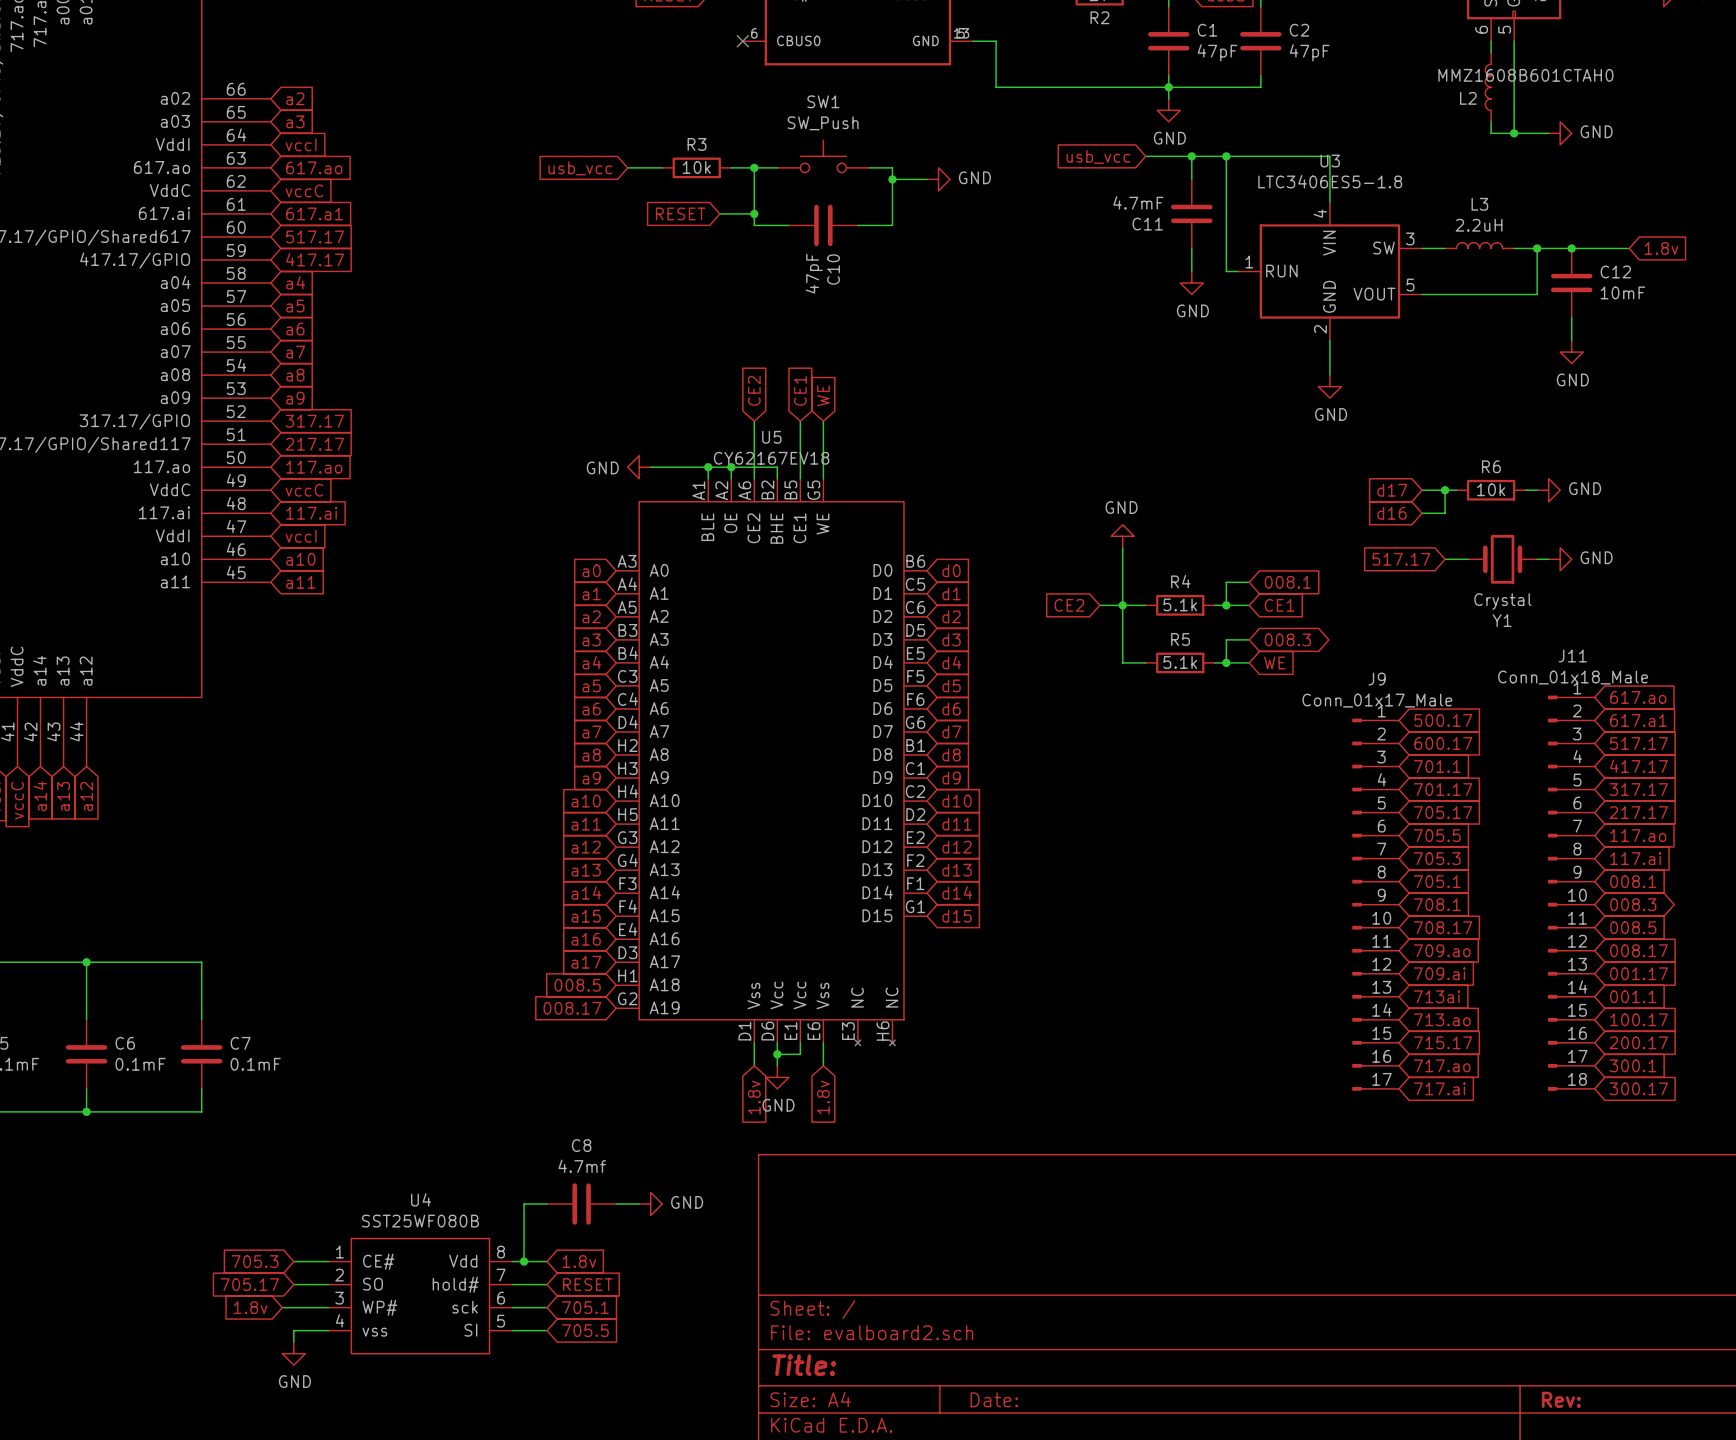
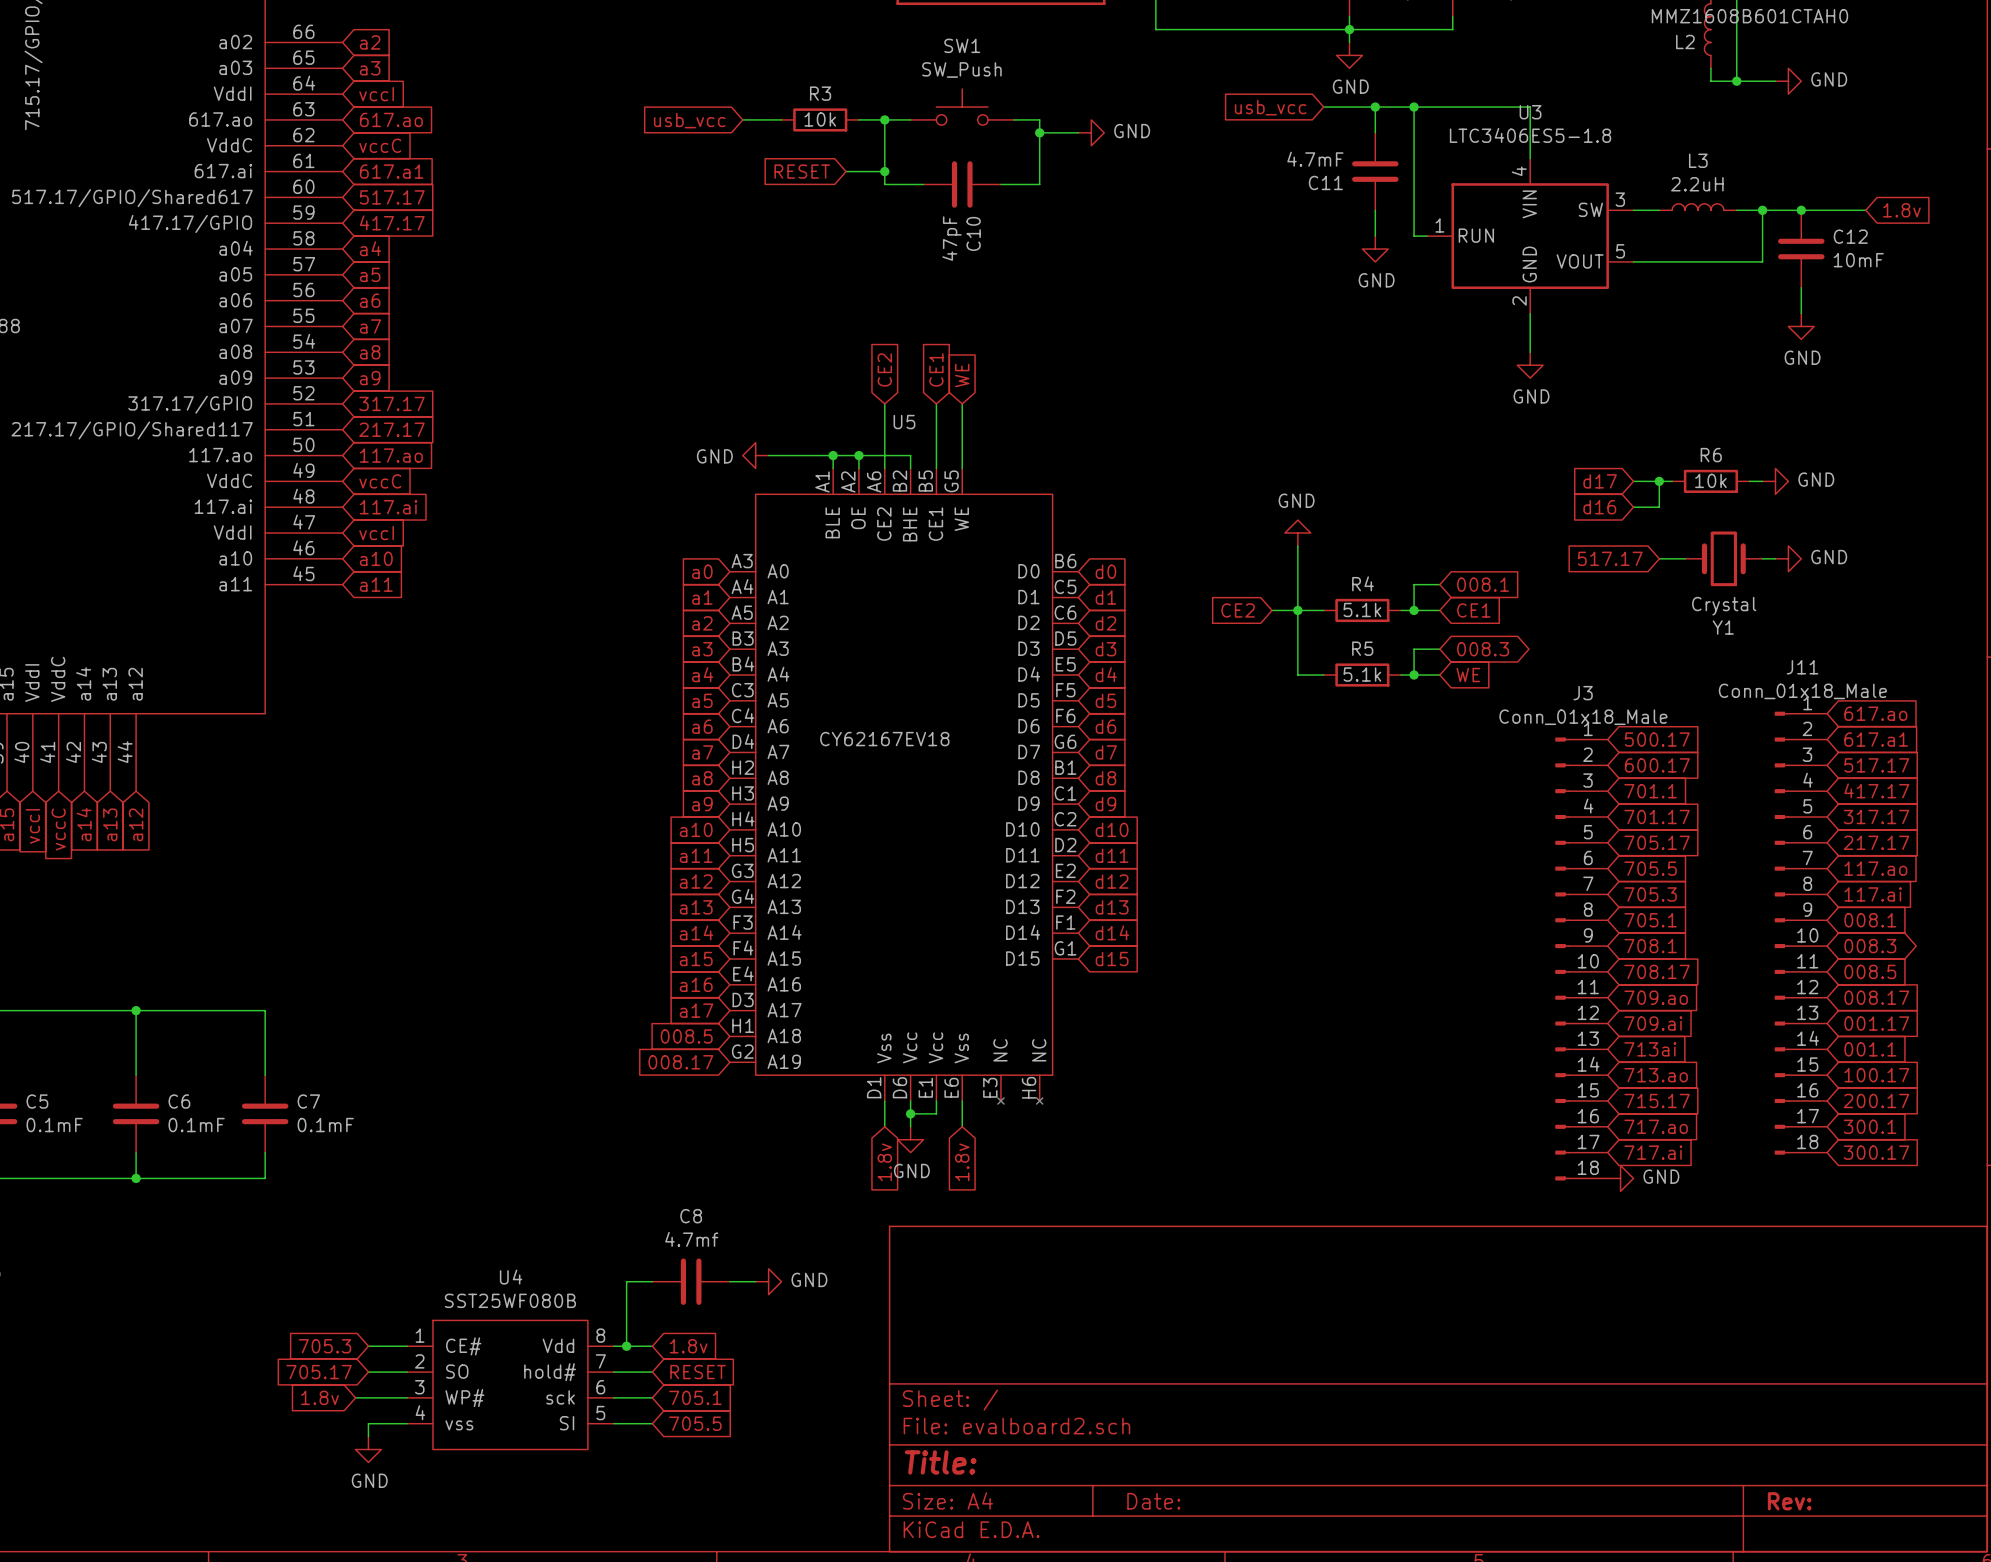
U5 value position: CY62167EV18 (771, 458) -> CY62167EV18 (884, 739)
J9: Conn_01x17_Male (1375, 904) -> none
J3: none -> Conn_01x18_Male (1581, 958)
power symbol: none -> GND (1620, 1178)

